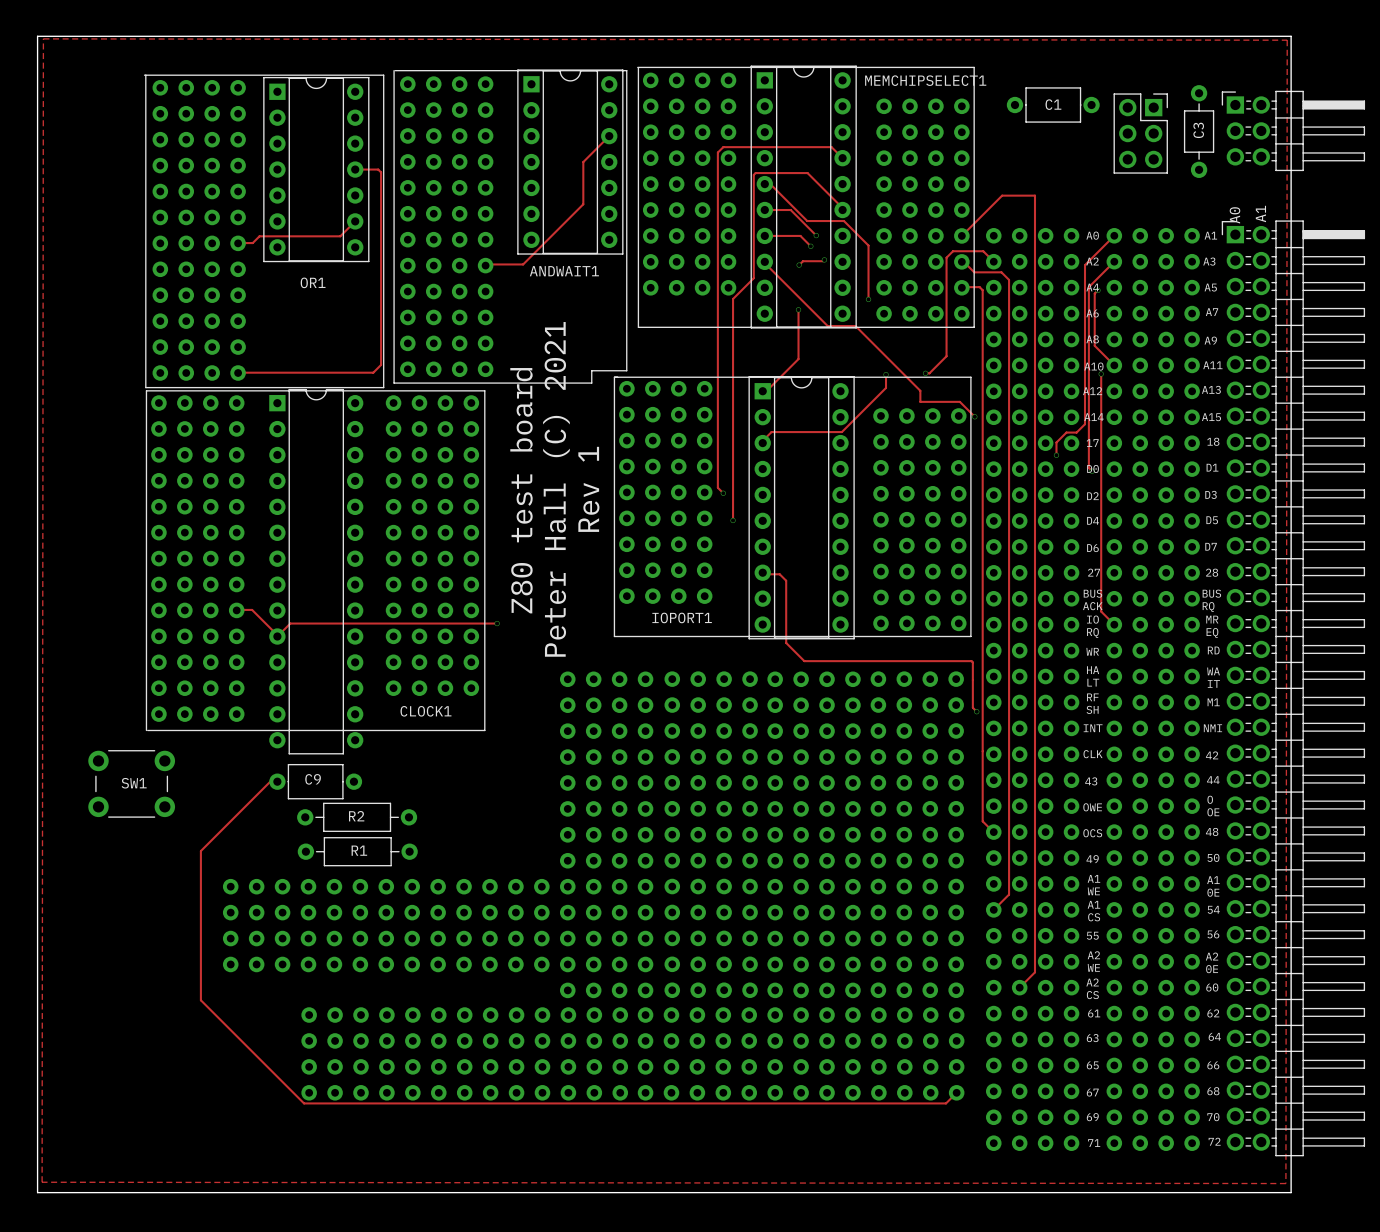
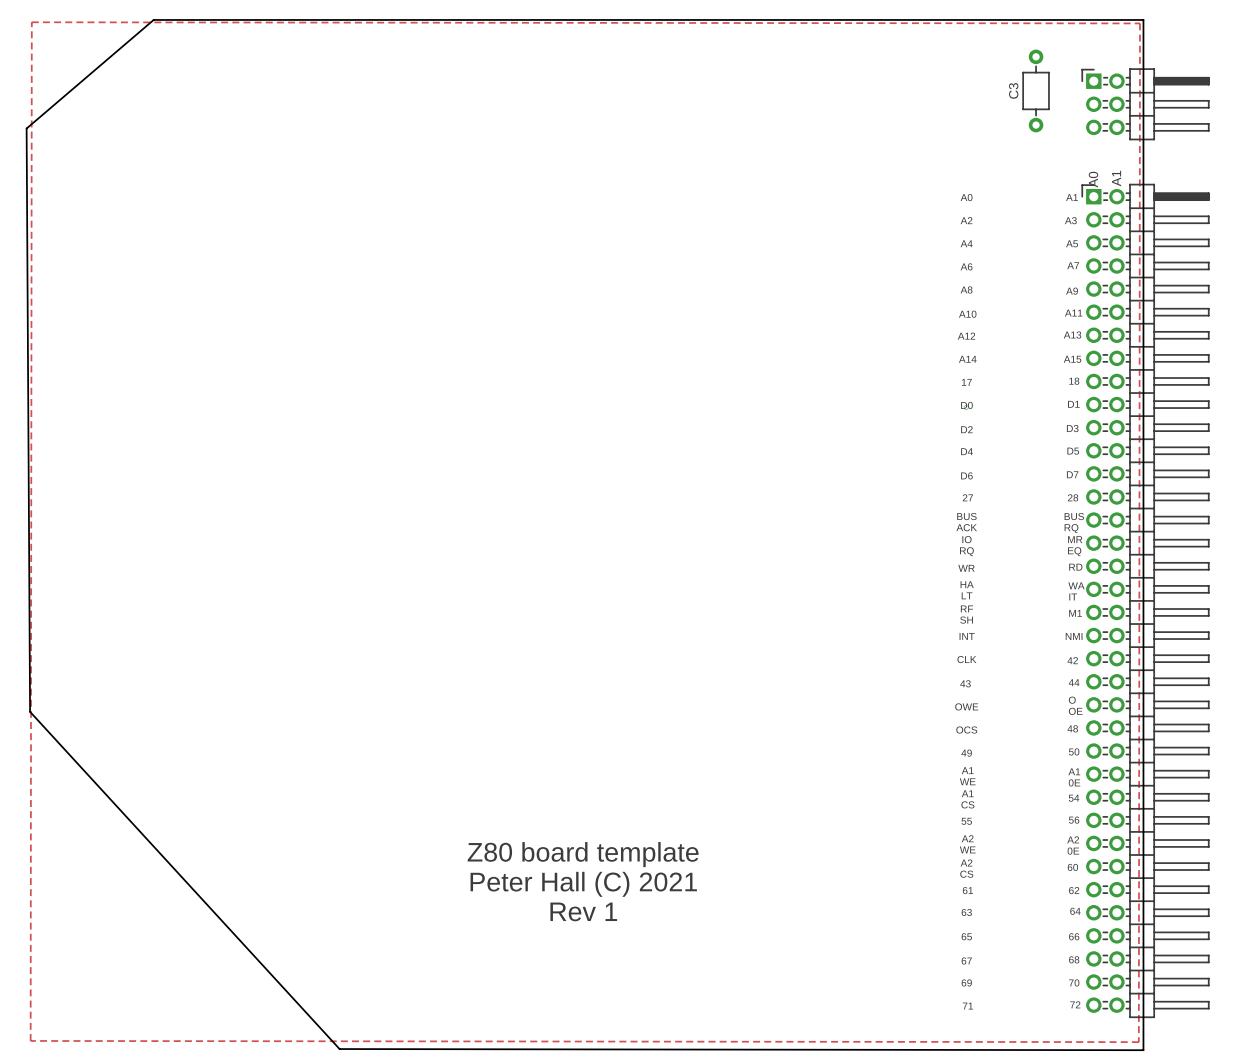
board edge: (180, 36) (37, 36) (37, 1192) (1291, 1192) -> (153, 19) (26, 128) (30, 711) (339, 1049) (1143, 1050)
line: (637, 67) (974, 67) (974, 327) (638, 327) (638, 68) -> none
line: (394, 70) (394, 383) (591, 383) (591, 370) (626, 370) (626, 70) (395, 70) -> none
line: (144, 75) (383, 75) (383, 387) (145, 387) (145, 75) -> none
C1: (1053, 105) -> none
C3 name position: C3 (1198, 130) -> C3 (1013, 90)
C3 position: (1199, 131) -> (1036, 90)
part: (1140, 133) -> none
track: (609, 136) (583, 162) (583, 204) (523, 264) (485, 264) -> none
track: (842, 158) (831, 147) (723, 147) (717, 152) (717, 487) (723, 493) -> none
ANDWAIT1: (570, 162) -> none
OR1: (316, 169) -> none
track: (355, 169) (378, 169) (381, 172) (381, 364) (373, 372) (238, 372) -> none
part: (689, 184) -> none
track: (764, 184) (770, 184) (807, 221) (843, 221) (868, 245) (868, 299) -> none
MEMCHIPSELECT1: (803, 197) -> none
track: (843, 209) (807, 173) (755, 173) (753, 174) (753, 278) (733, 298) (733, 520) -> none
track: (764, 210) (790, 210) (816, 235) -> none
part: (922, 210) -> none
track: (355, 221) (340, 236) (259, 236) (252, 243) (238, 243) -> none
part: (446, 226) -> none
part: (199, 230) -> none
track: (765, 235) (800, 235) (810, 246) -> none
via: (816, 235) -> none
track: (1114, 235) (1085, 265) (1085, 424) (1076, 432) (1066, 432) (1056, 442) (1056, 455) -> none
track: (961, 236) (1002, 195) (1034, 195) (1034, 972) (1019, 987) -> none
via: (810, 246) -> none
track: (824, 259) (803, 261) (799, 265) -> none
via: (824, 259) -> none
track: (762, 260) (827, 326) (855, 326) (920, 390) (920, 401) (959, 401) (974, 416) -> none
track: (962, 260) (974, 272) (1001, 272) (1009, 279) (1009, 894) (993, 909) -> none
track: (993, 261) (983, 251) (953, 251) (946, 257) (946, 356) (929, 373) (925, 373) -> none
track: (1114, 261) (1088, 287) (1088, 467) (1092, 471) -> none
via: (799, 265) -> none
track: (962, 287) (979, 287) (982, 290) (982, 821) (992, 831) -> none
track: (1097, 290) (1094, 293) (1094, 345) (1114, 365) -> none
via: (1097, 290) -> none
via: (868, 299) -> none
track: (798, 309) (798, 359) (766, 391) (762, 391) -> none
via: (798, 309) -> none
via: (925, 373) -> none
track: (1101, 373) (1101, 611) (1114, 624) -> none
via: (1101, 373) -> none
track: (886, 374) (886, 387) (841, 432) (771, 432) (763, 440) -> none
via: (886, 374) -> none
line: (614, 377) (970, 377) (970, 636) (614, 636) (614, 377) -> none
via: (974, 416) -> none
via: (1056, 455) -> none
text: Peter Hall (C) 2021 (556, 489) -> none
text: Rev 1 (588, 489) -> none
text: Z80 test board (521, 490) -> none
part: (665, 492) -> none
via: (723, 493) -> none
IOPORT1: (801, 507) -> none
part: (919, 519) -> none
via: (733, 520) -> none
part: (432, 545) -> none
part: (197, 558) -> none
CLOCK1: (316, 571) -> none
track: (762, 574) (779, 574) (786, 580) (786, 642) (804, 661) (971, 661) (972, 707) (976, 711) -> none
track: (236, 609) (252, 609) (278, 635) (290, 623) (497, 623) -> none
via: (497, 623) -> none
part: (1032, 689) -> none
part: (1153, 689) -> none
via: (976, 711) -> none
line: (146, 730) (146, 390) (484, 390) (484, 730) (147, 730) -> none
track: (276, 775) (200, 851) (200, 1000) (304, 1103) (946, 1103) (956, 1092) -> none
C9: (315, 781) -> none
SW1: (131, 783) -> none
R2: (357, 817) -> none
part: (606, 834) -> none
part: (711, 834) -> none
part: (814, 834) -> none
part: (917, 834) -> none
R1: (357, 851) -> none
part: (386, 925) -> none
text: none -> Z80 board template (583, 854)
text: none -> Peter Hall (C) 2021 (583, 884)
text: none -> Rev 1 (583, 911)
part: (464, 1053) -> none
part: (801, 1053) -> none

